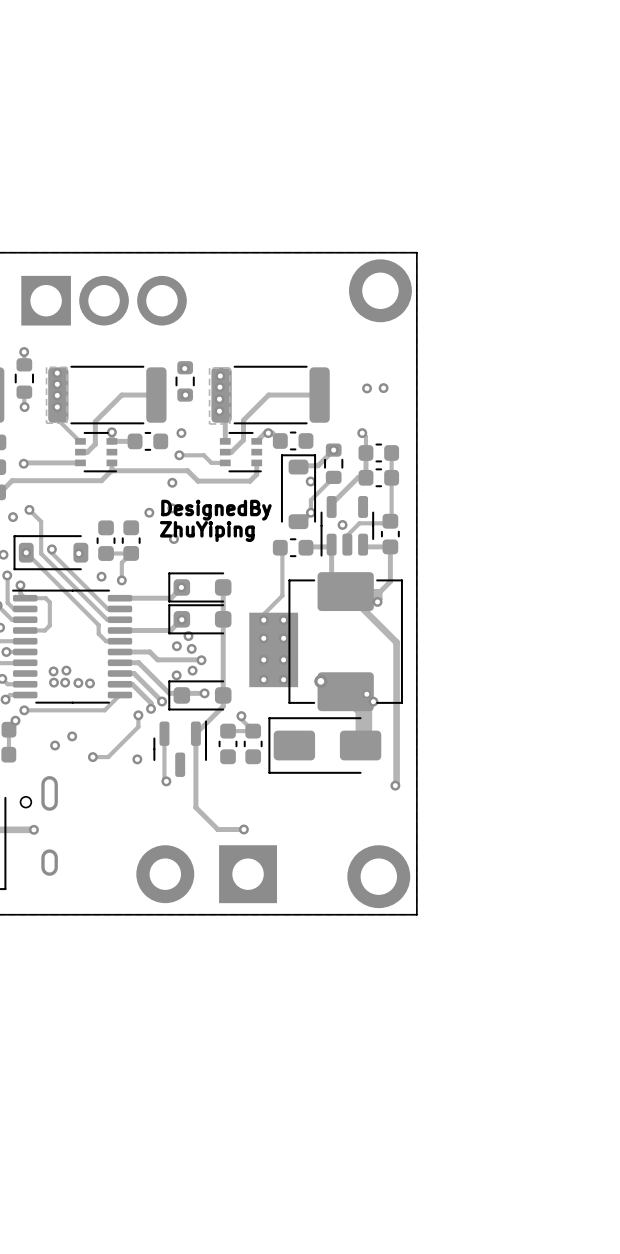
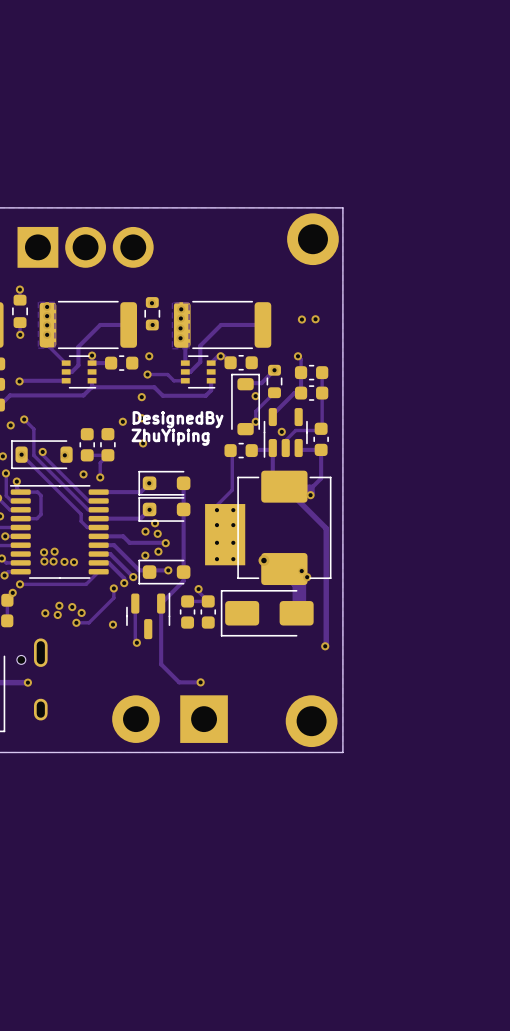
via: none -> (72, 607)
via: none -> (81, 612)
via: none -> (57, 614)

